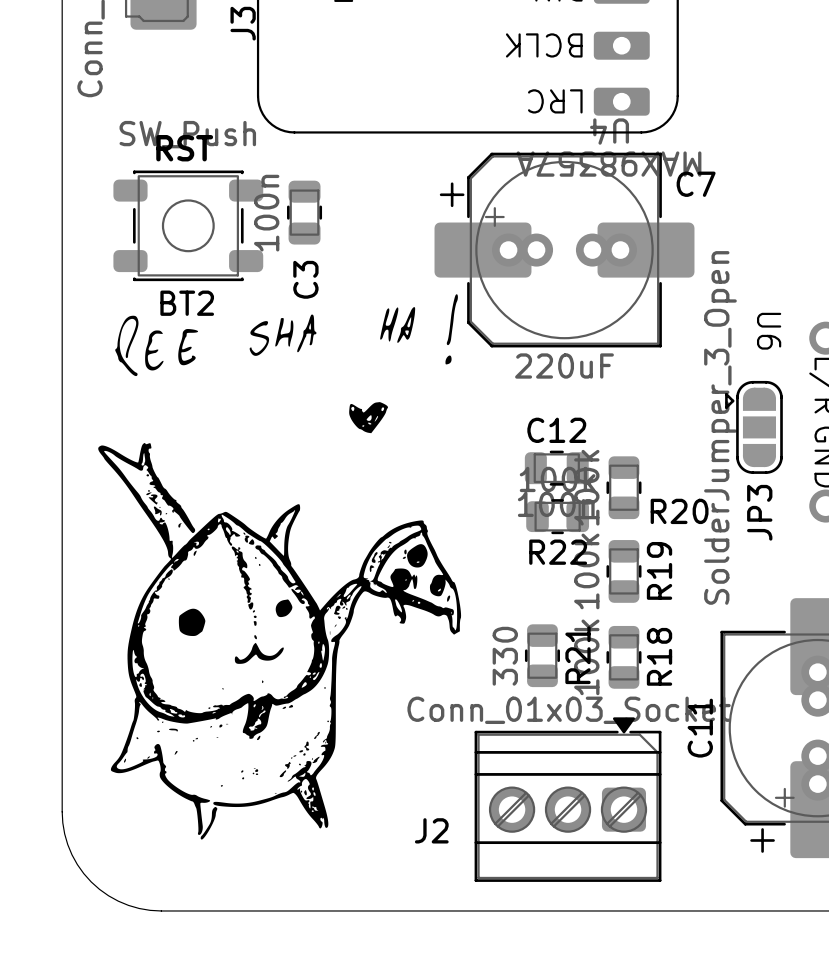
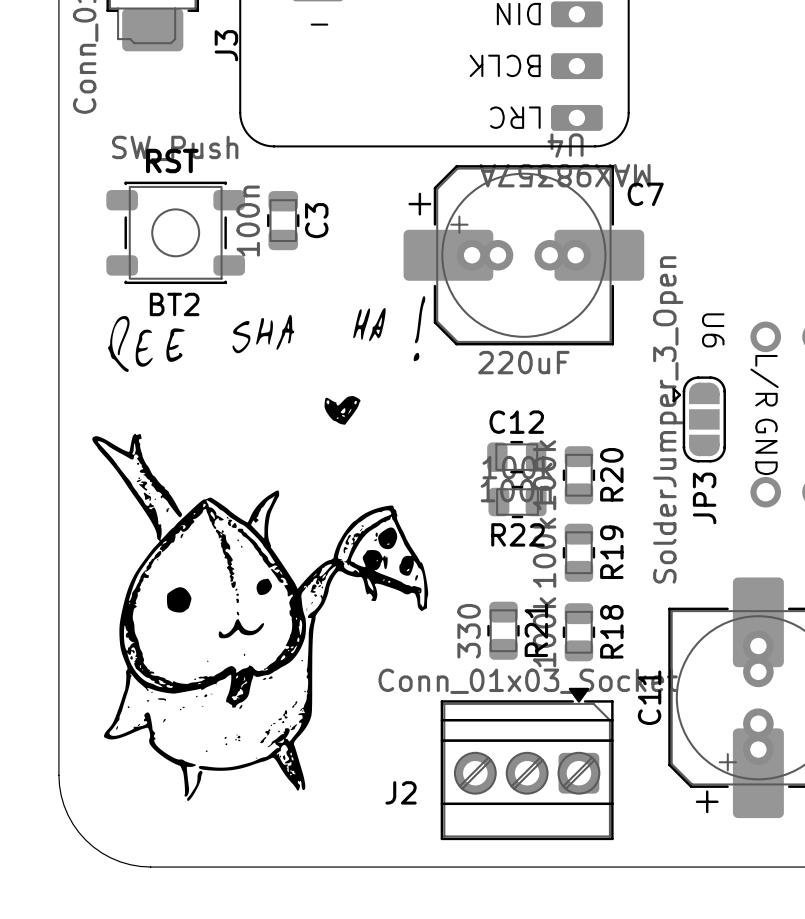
C3 name position: C3 (305, 279) -> C3 (316, 220)
R20 name rotation: 0° (679, 511) -> 90° counterclockwise (611, 474)

